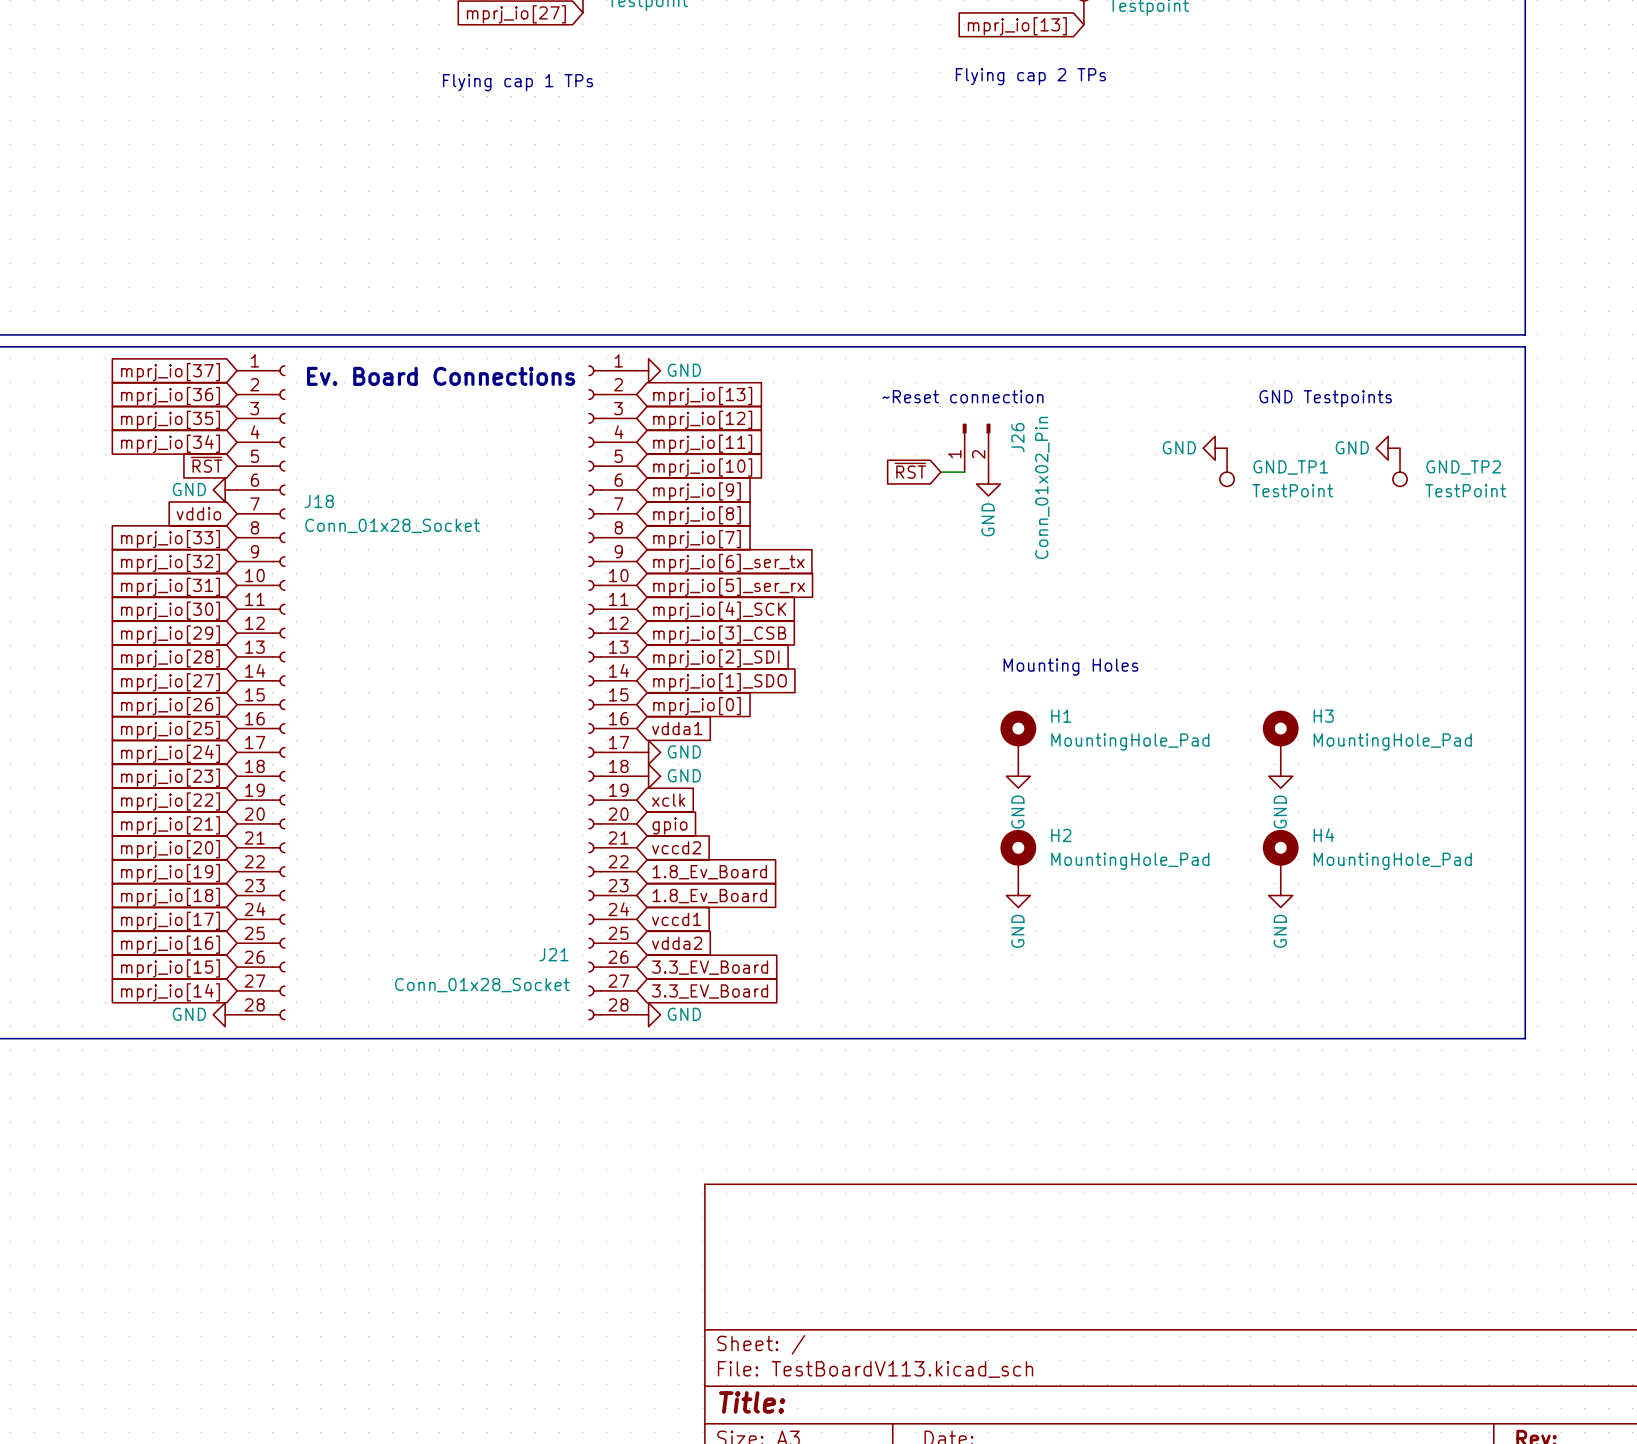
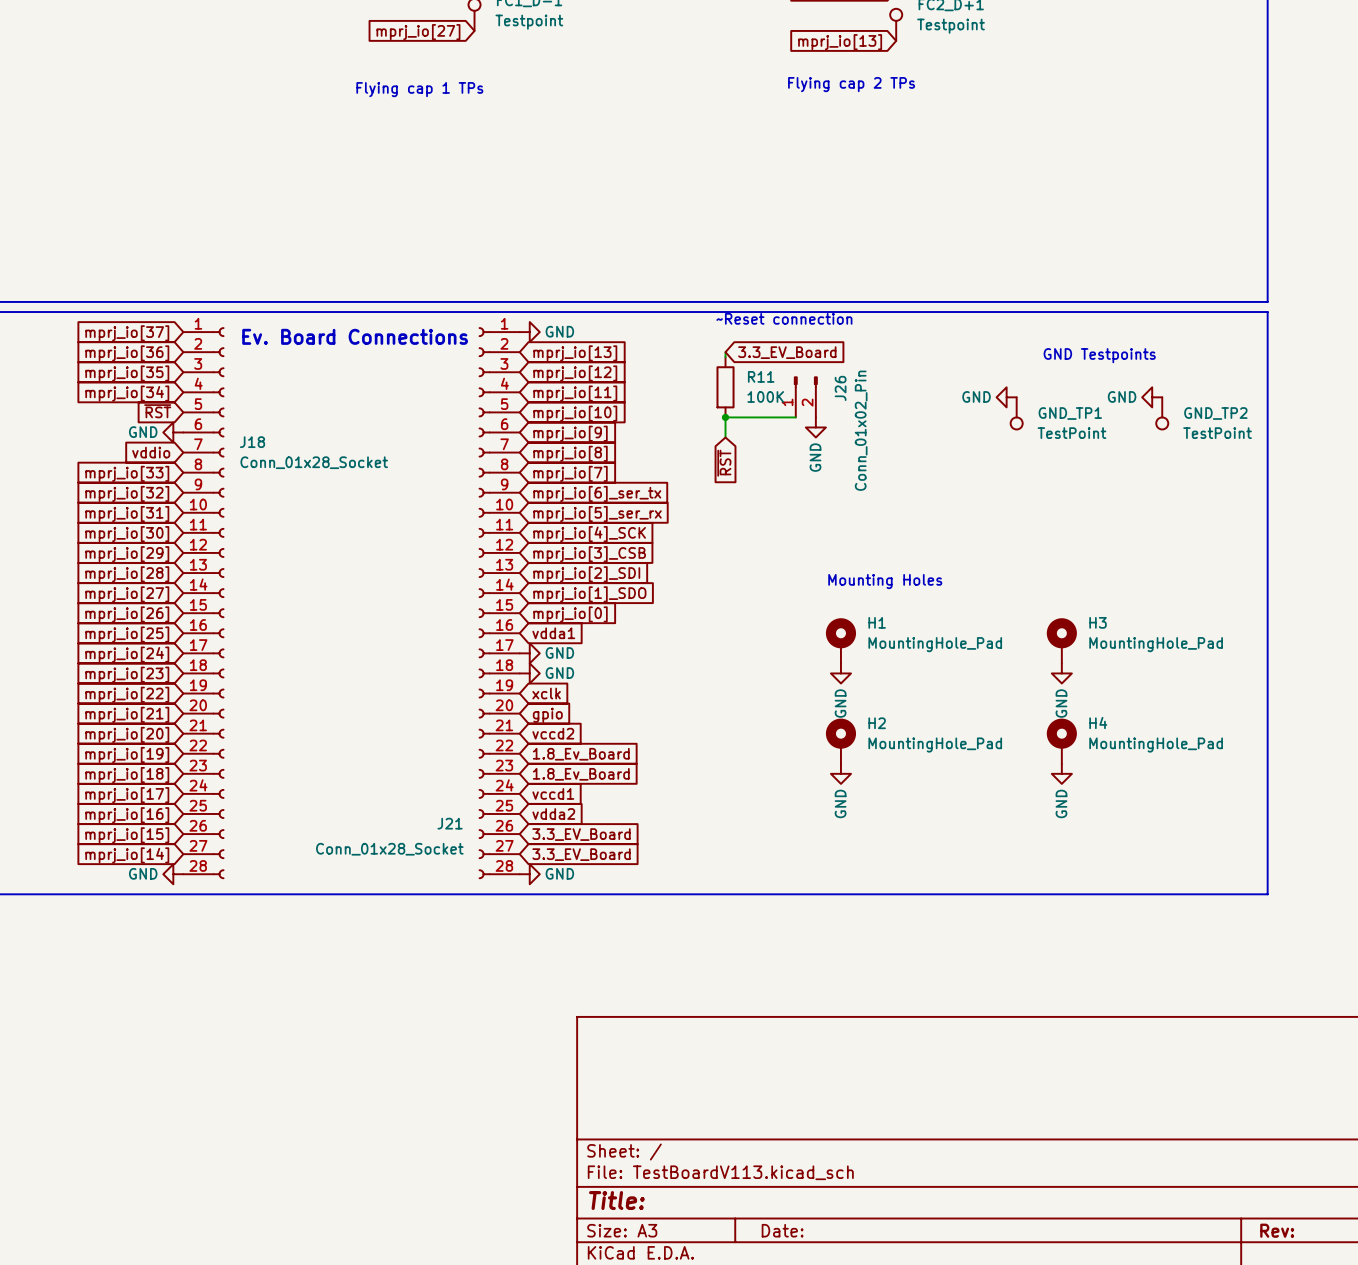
wire: none -> (725, 352) (725, 357)
global label: none -> 3.3_EV_Board (787, 352)
text position: ~Reset connection (963, 396) -> ~Reset connection (784, 318)
R11: none -> 100K (725, 387)
global label rotation: 0° (910, 470) -> 90° counterclockwise (724, 463)
junction: none -> (725, 417)
wire: none -> (775, 417) (725, 417) (725, 437)

